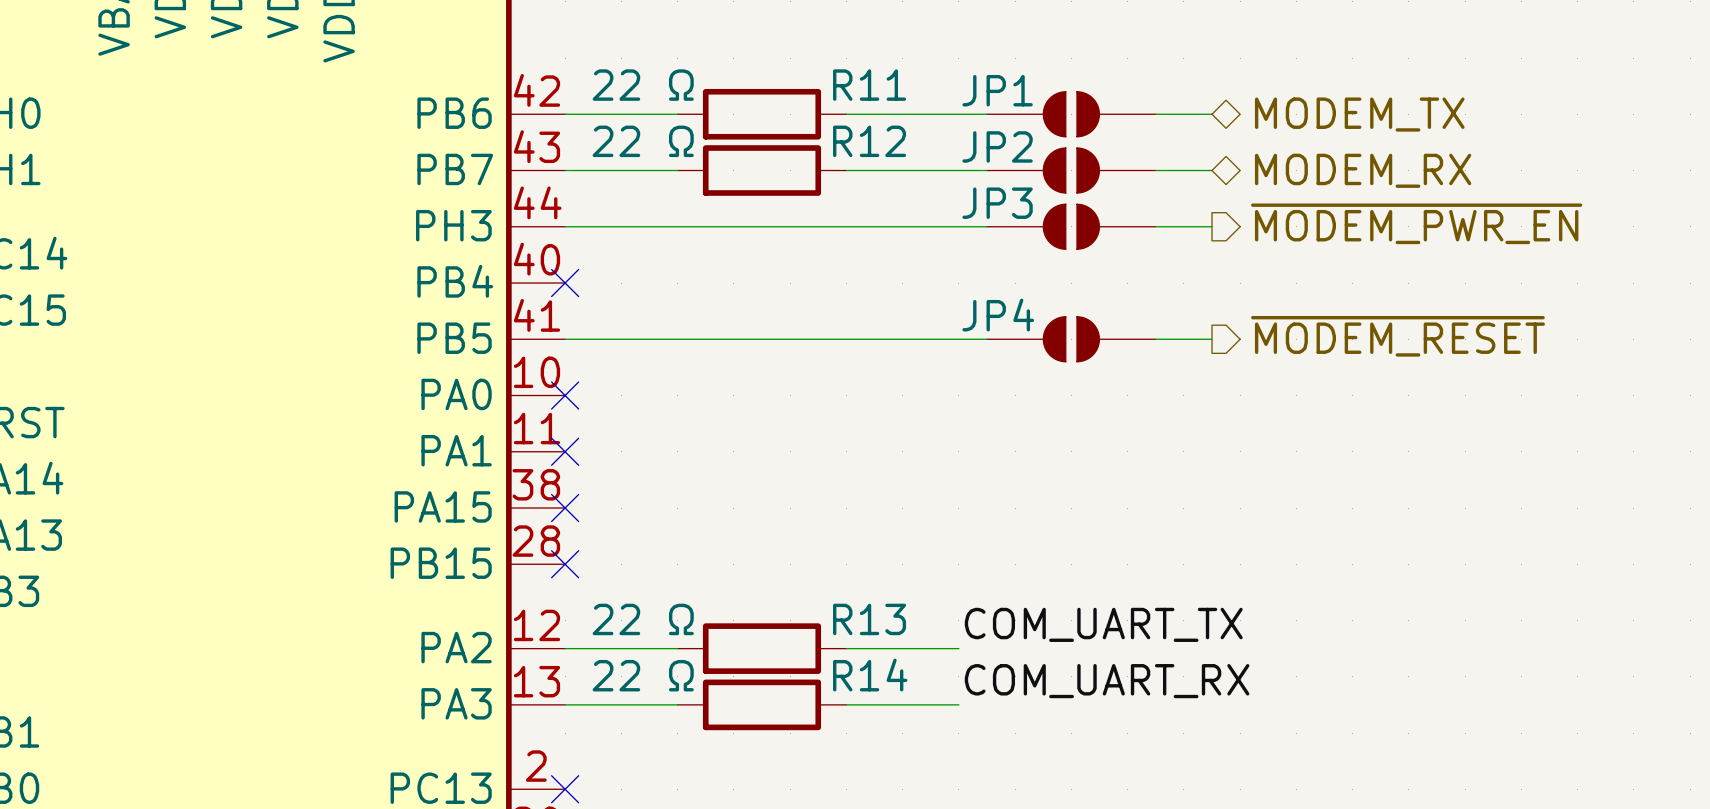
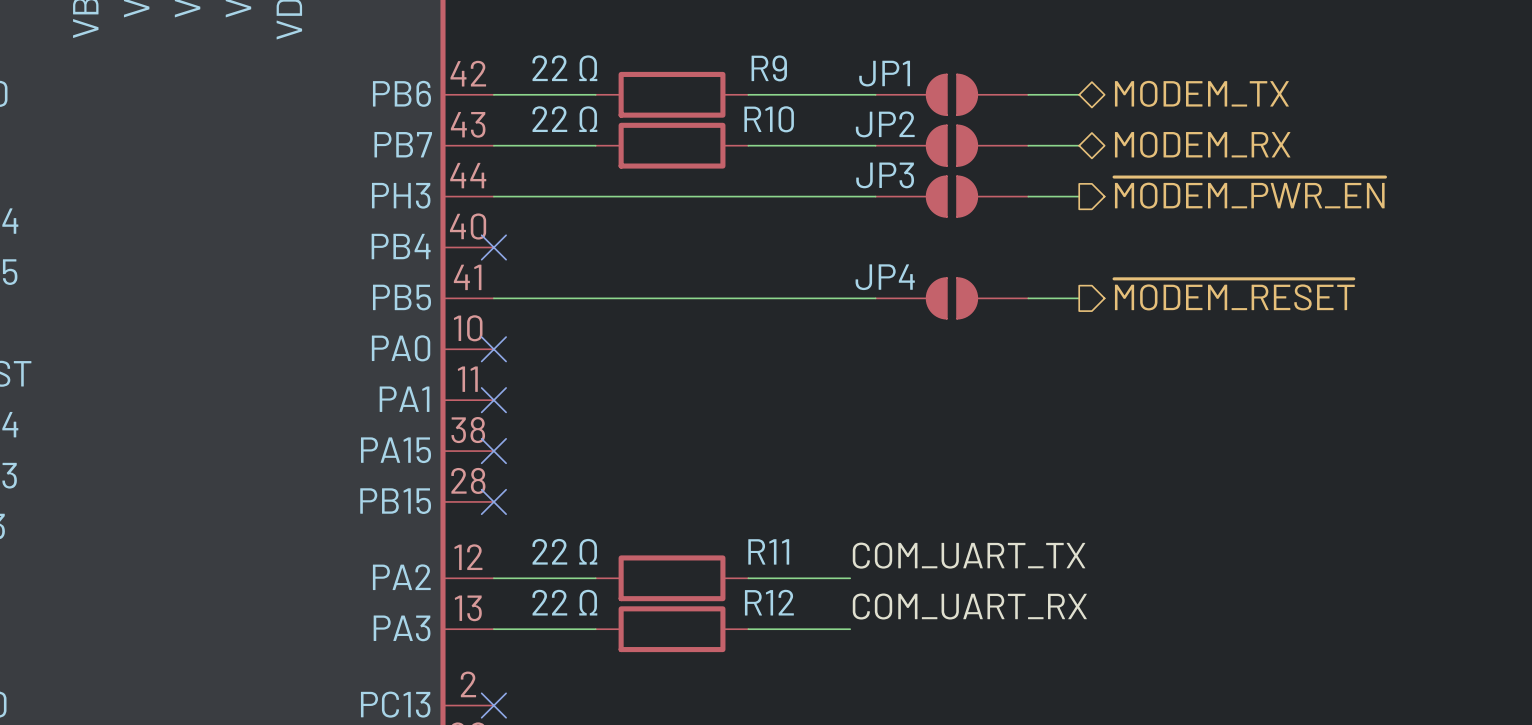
R11 name: R11 (869, 85) -> R9 (769, 68)
R12 name: R12 (869, 141) -> R10 (769, 119)
R13 name: R13 (869, 619) -> R11 (768, 551)
R14 name: R14 (870, 675) -> R12 (769, 602)

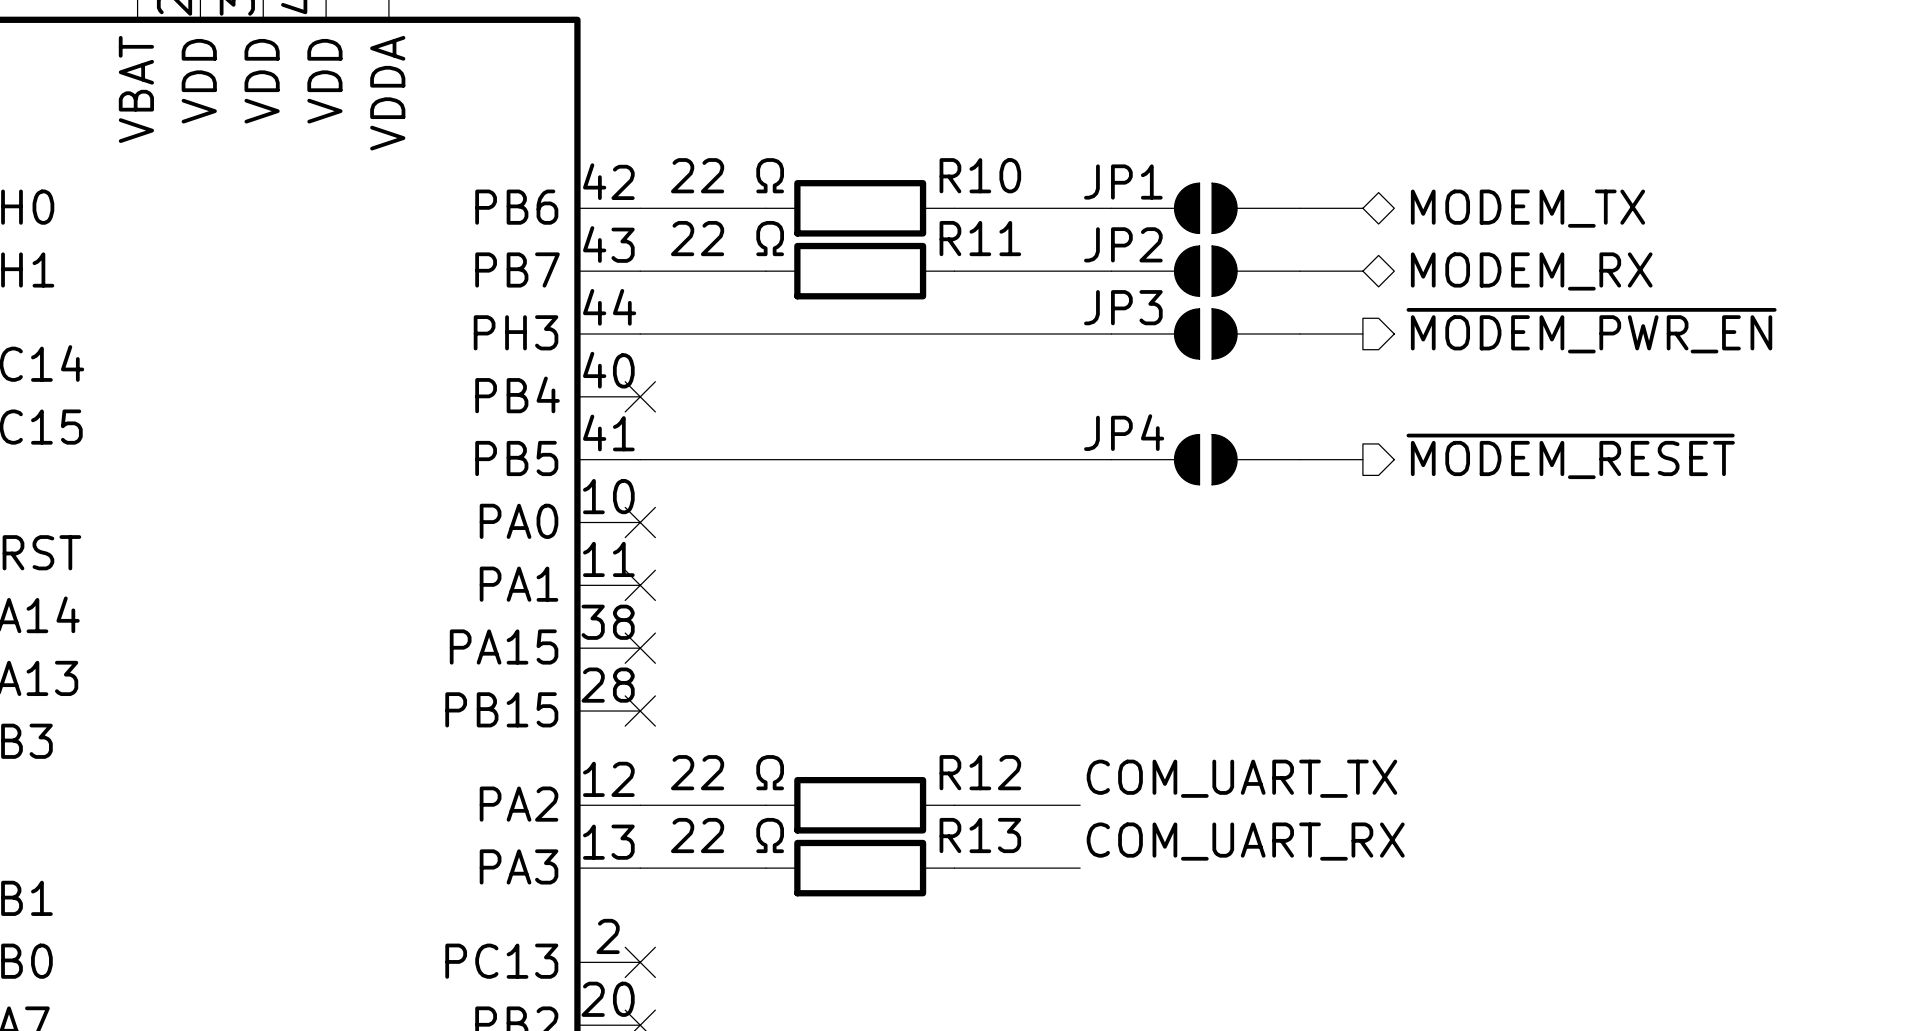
R9 name: R9 (769, 68) -> R10 (980, 175)
R10 name: R10 (769, 119) -> R11 (980, 238)
R11 name: R11 (768, 551) -> R12 (980, 772)
R12 name: R12 (769, 602) -> R13 (980, 835)

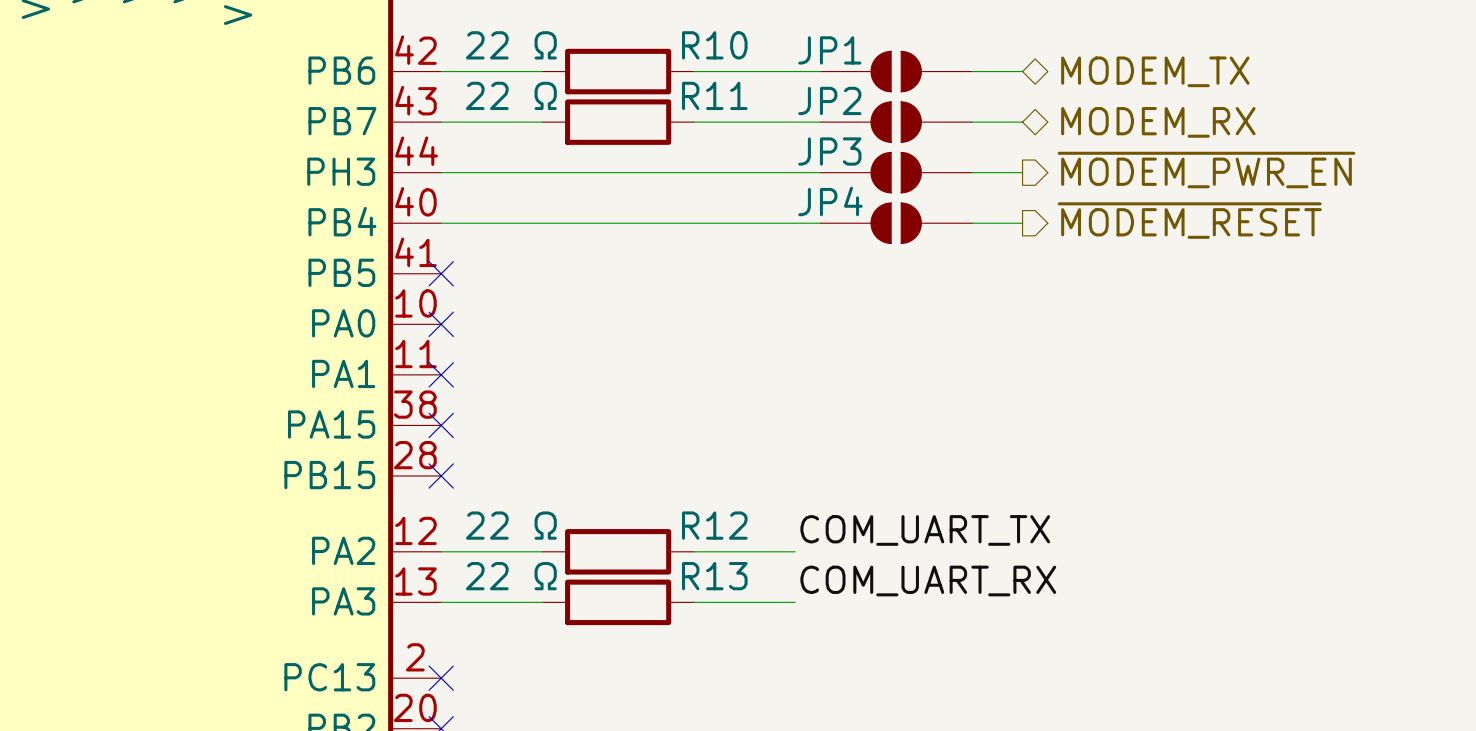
no-connect mark position: (640, 396) -> (441, 273)
hierarchical label position: ~{MODEM_RESET} (1570, 456) -> ~{MODEM_RESET} (1189, 220)
wire: (640, 459) (1111, 459) -> (441, 223) (820, 223)
JP4 position: (1205, 459) -> (896, 223)
wire: (1300, 459) (1362, 459) -> (972, 223) (1022, 223)

